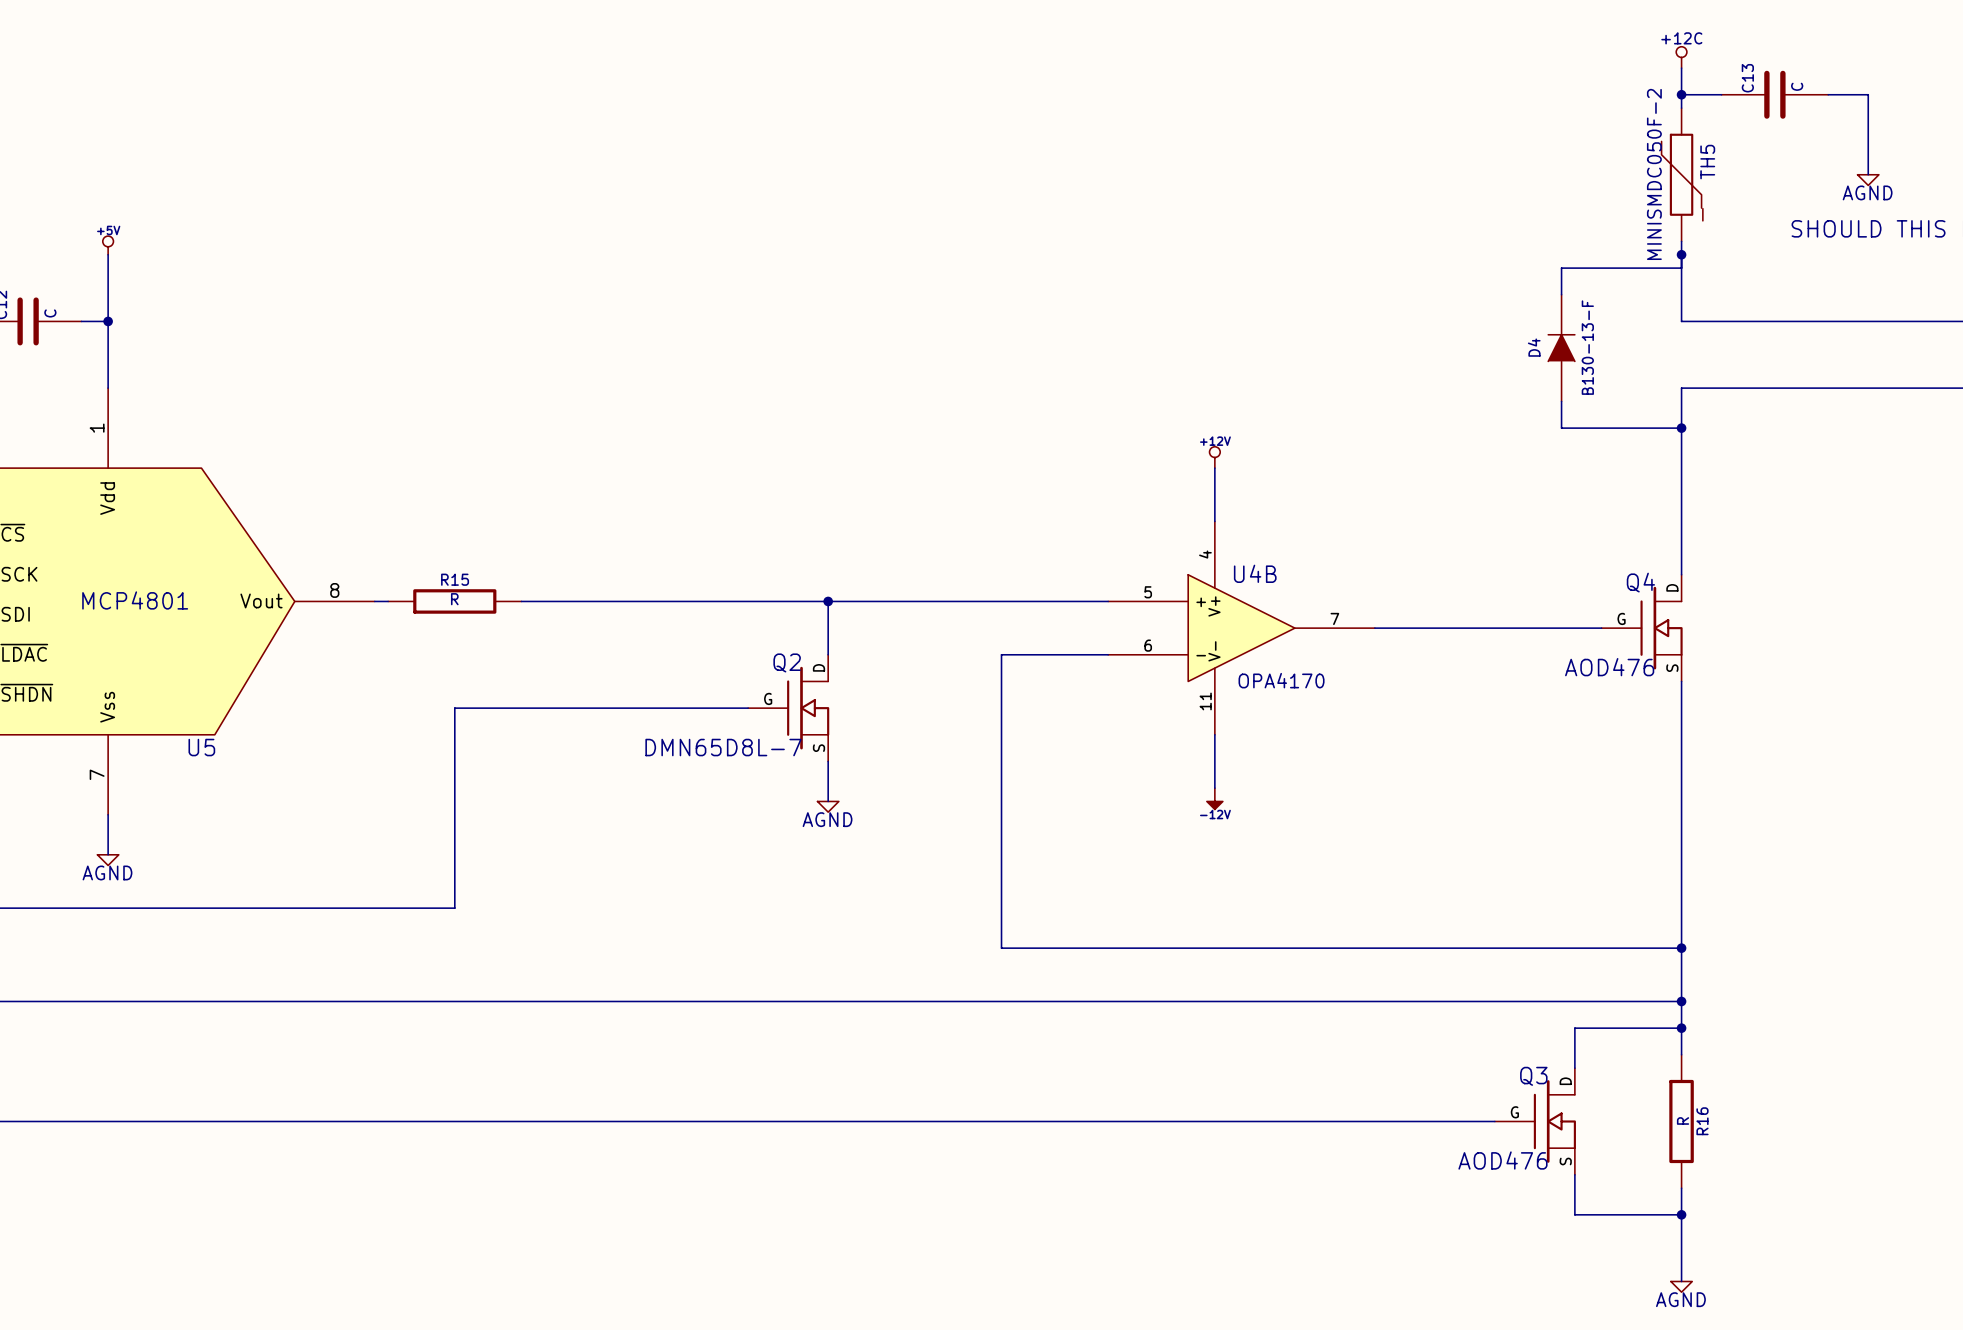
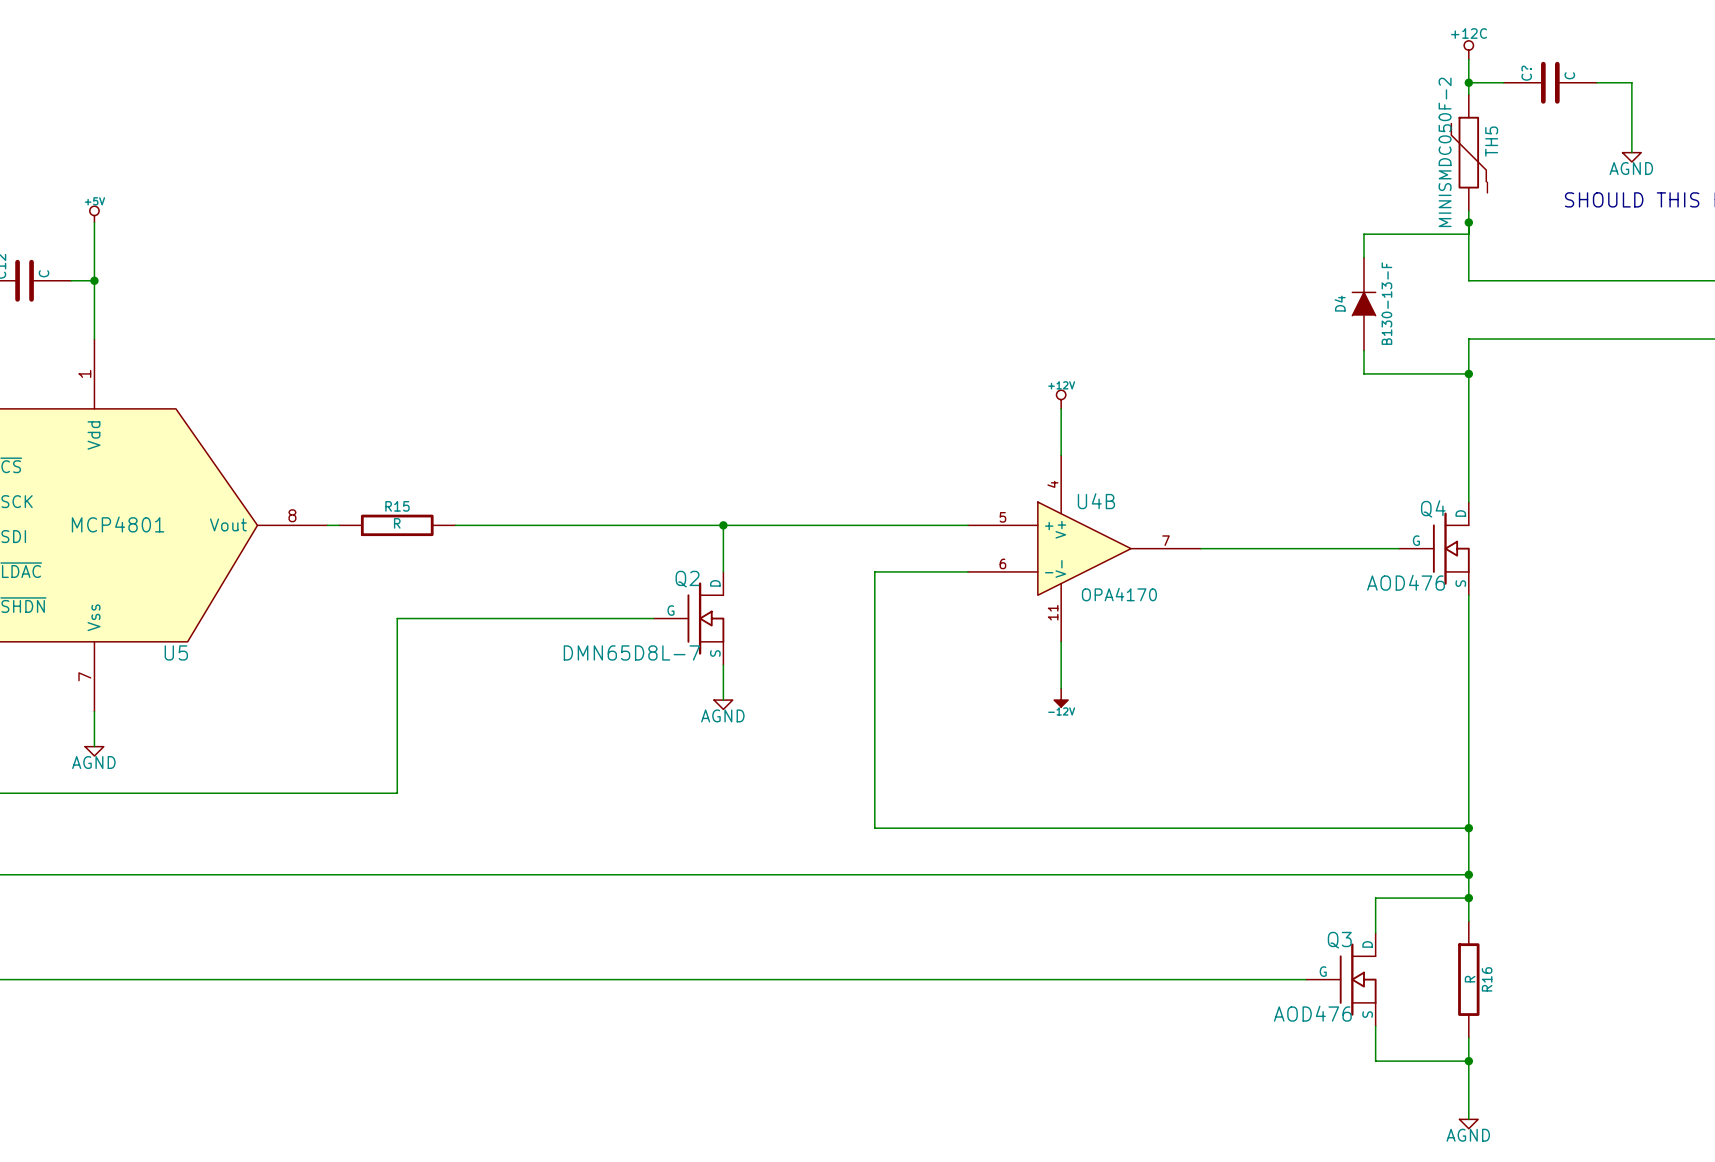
C13 name: C13 (1747, 78) -> C? (1526, 73)

